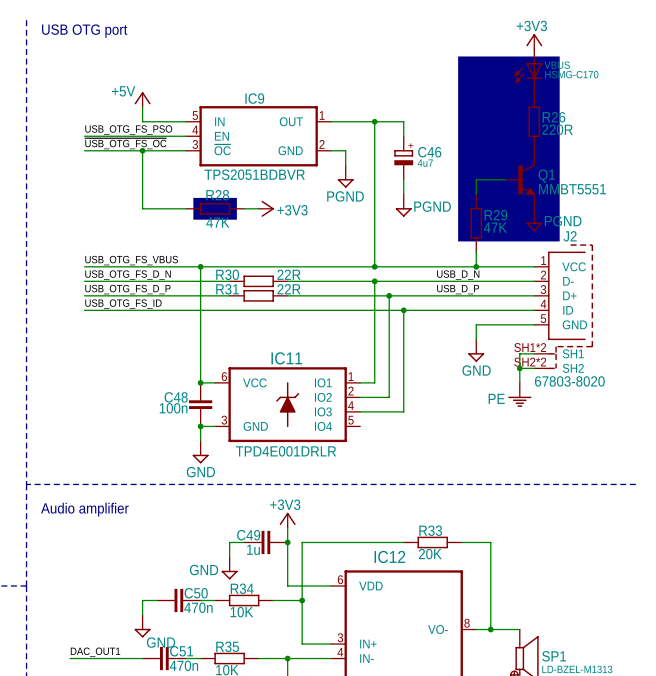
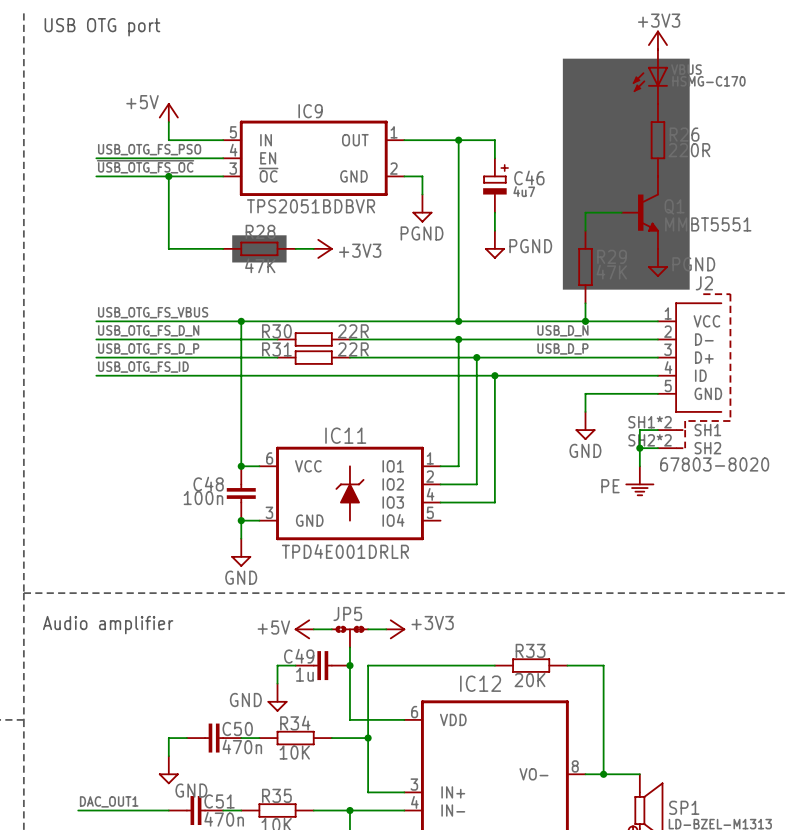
power symbol text position: +3V3 (285, 504) -> +3V3 (432, 623)
power symbol: none -> +5V (304, 629)
wire: none -> (313, 629) (331, 629)
wire: none -> (368, 629) (386, 629)
power symbol rotation: 0° (287, 518) -> 90° clockwise (397, 629)
JP5: none -> (349, 636)
power symbol position: +3V3 (287, 520) -> +3V3 (395, 629)

